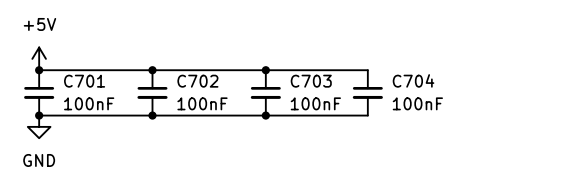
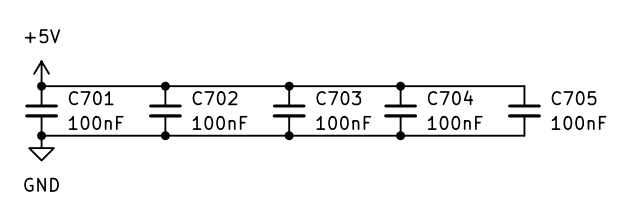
wire: none -> (400, 86) (524, 86)
junction: none -> (400, 86)
C705: none -> 100nF (524, 110)
wire: none -> (400, 135) (524, 135)
junction: none -> (400, 135)

